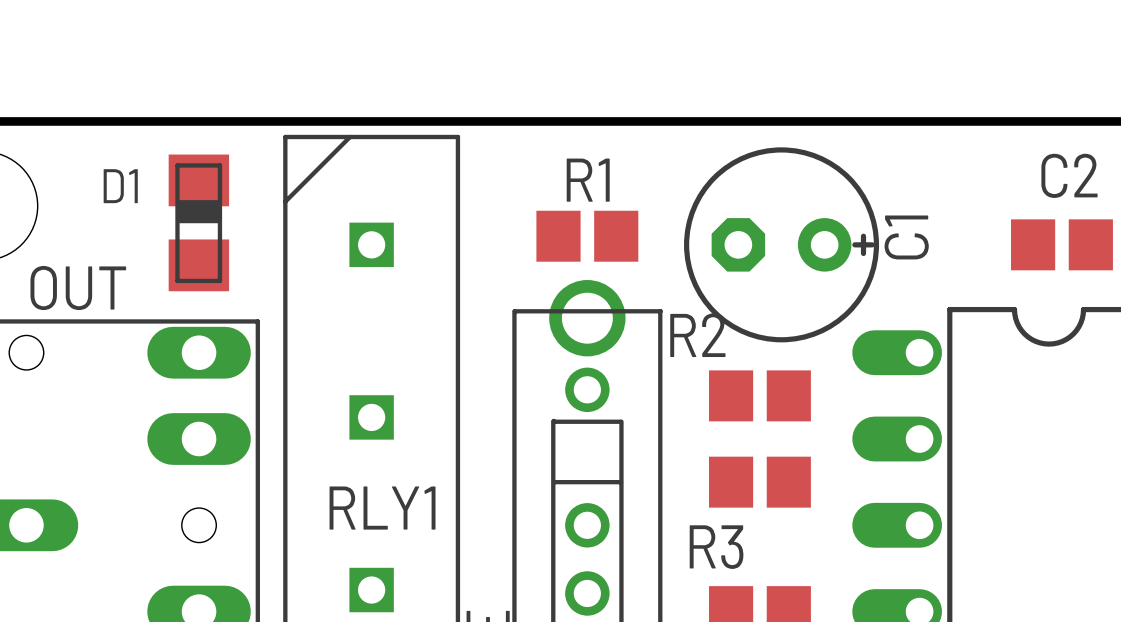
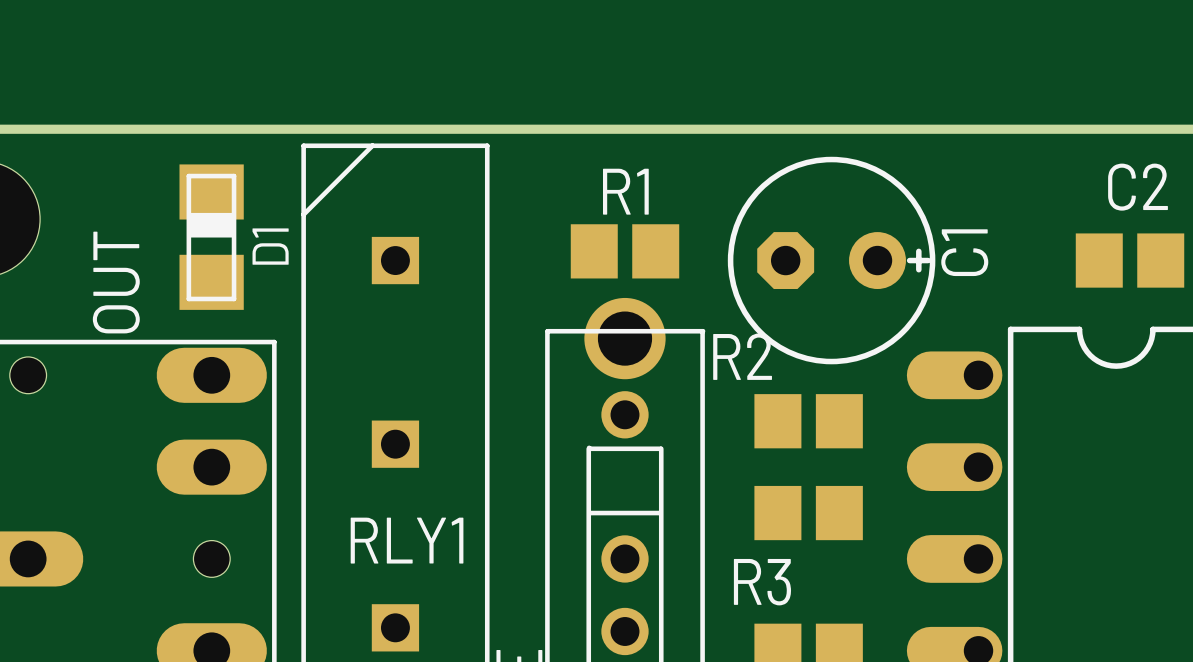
D1 name rotation: 0° (120, 186) -> 90° counterclockwise (270, 246)
D1 name position: D1 (120, 186) -> D1 (270, 246)
OUT name rotation: 0° (78, 288) -> 90° counterclockwise (116, 282)

